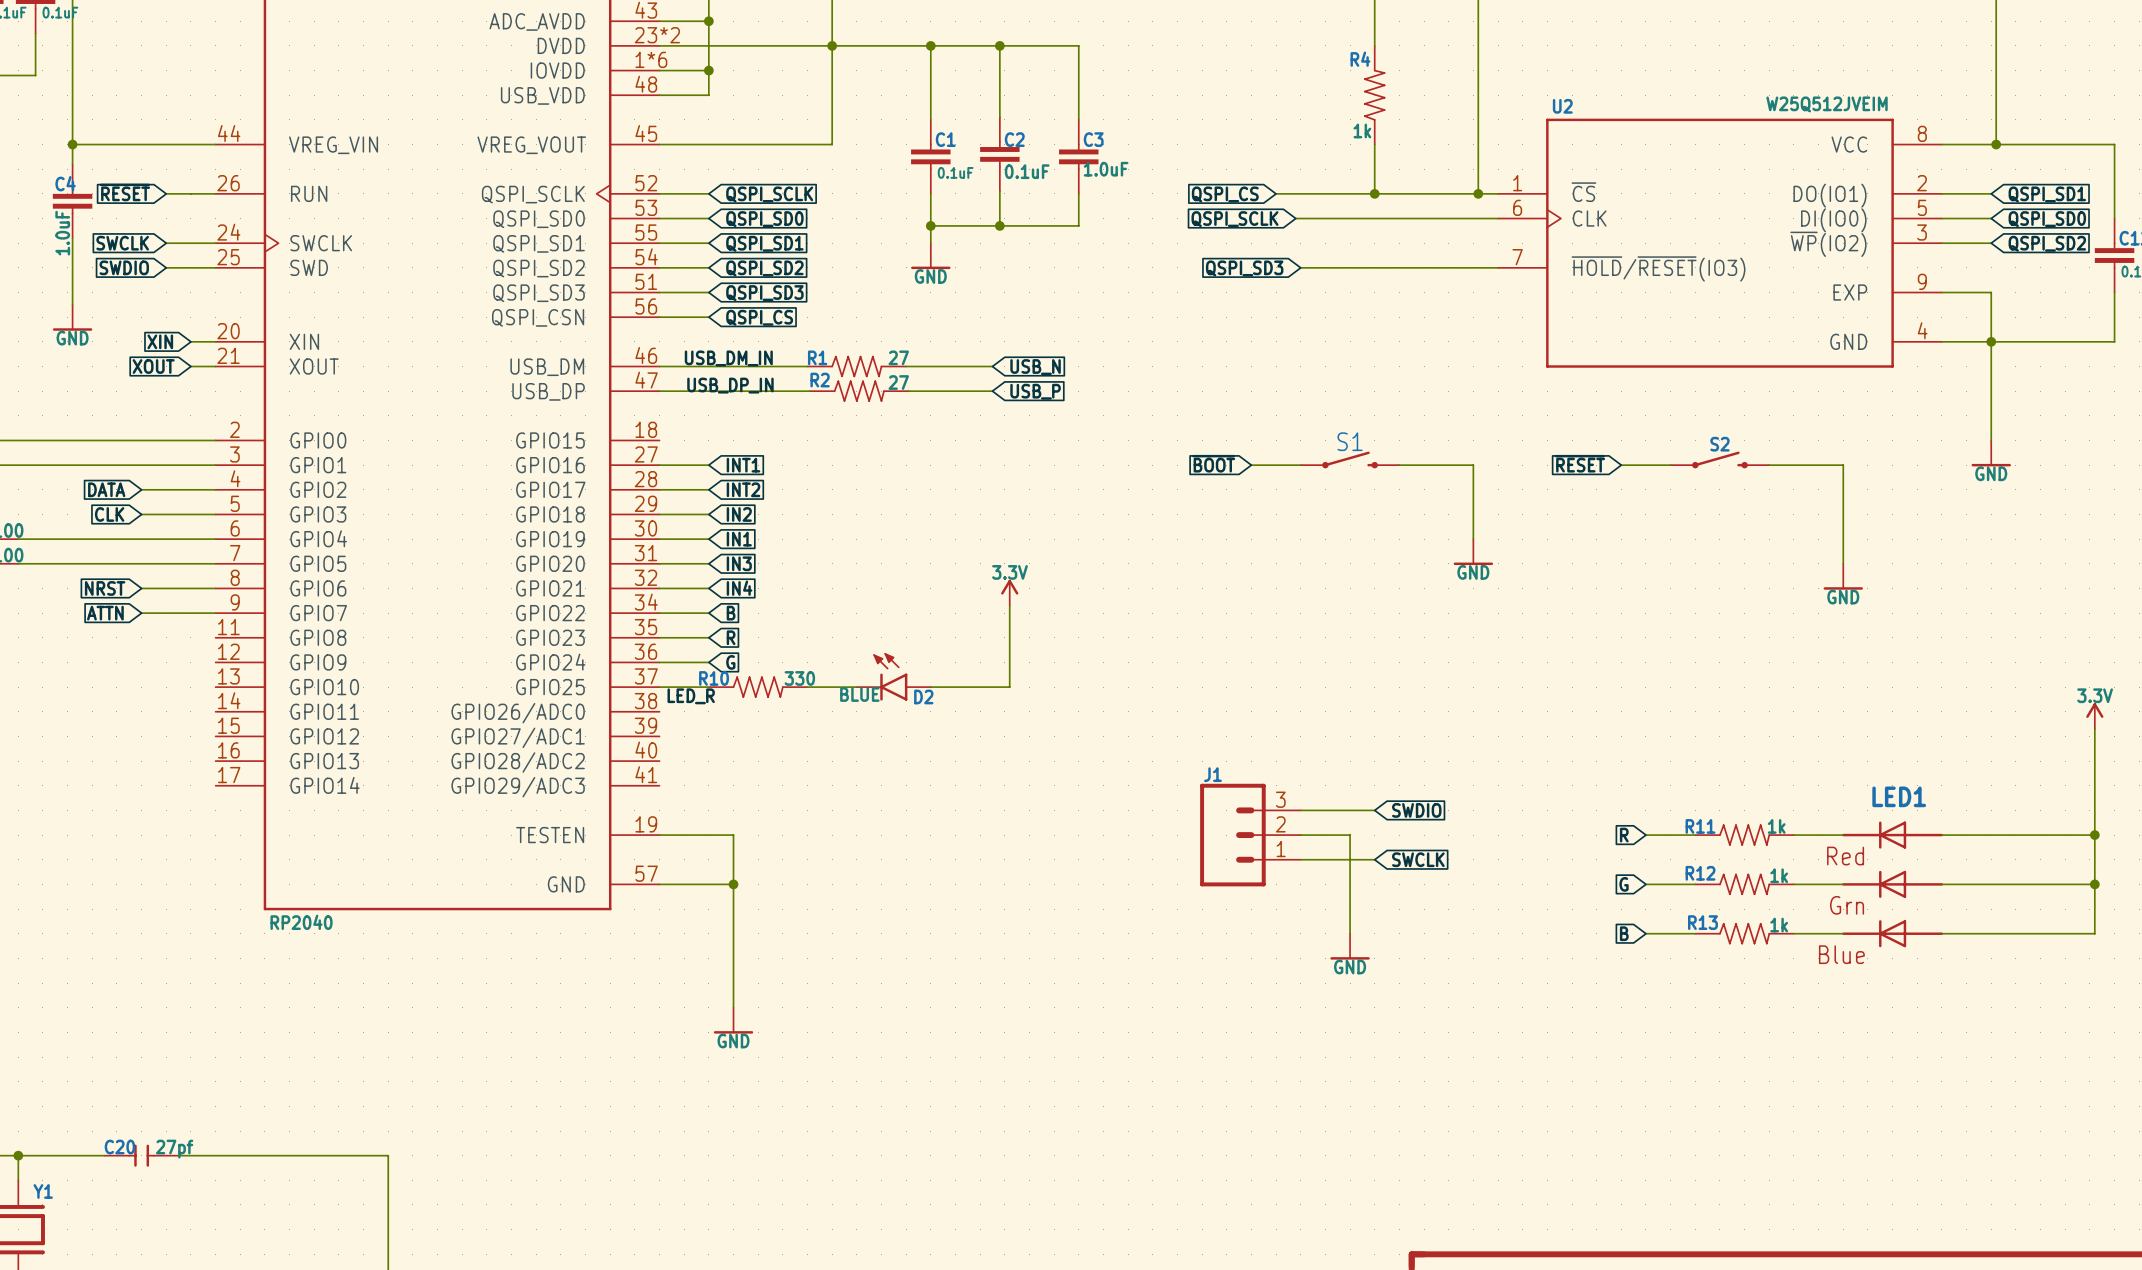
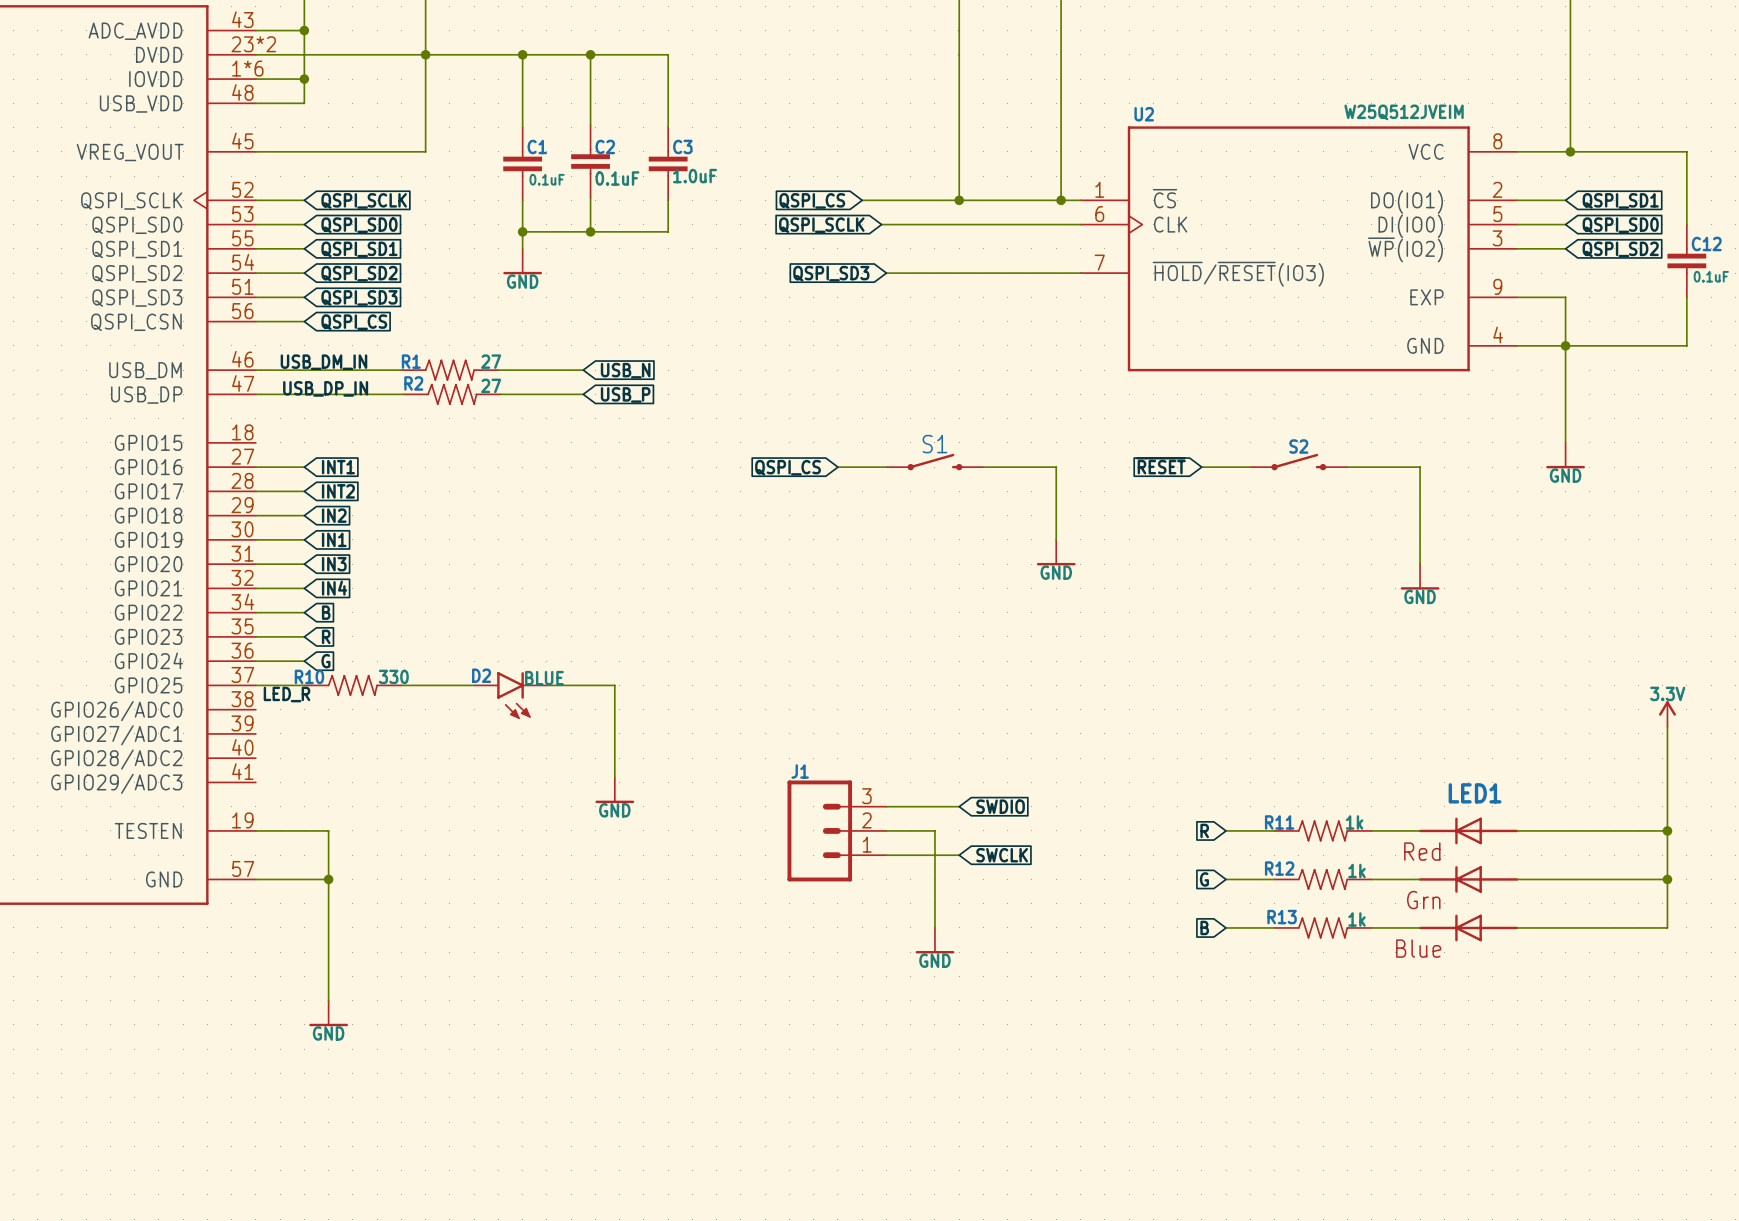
R4: 1k (1374, 95) -> none
global label: ~{BOOT} (1213, 463) -> QSPI_CS (788, 467)
power symbol: 3.3V (1009, 592) -> none
wire: (1009, 605) (1009, 687) -> (614, 777) (614, 685) (600, 685)
D2 rotation: 0° (890, 676) -> 180° (513, 695)
power symbol: none -> GND (614, 790)

